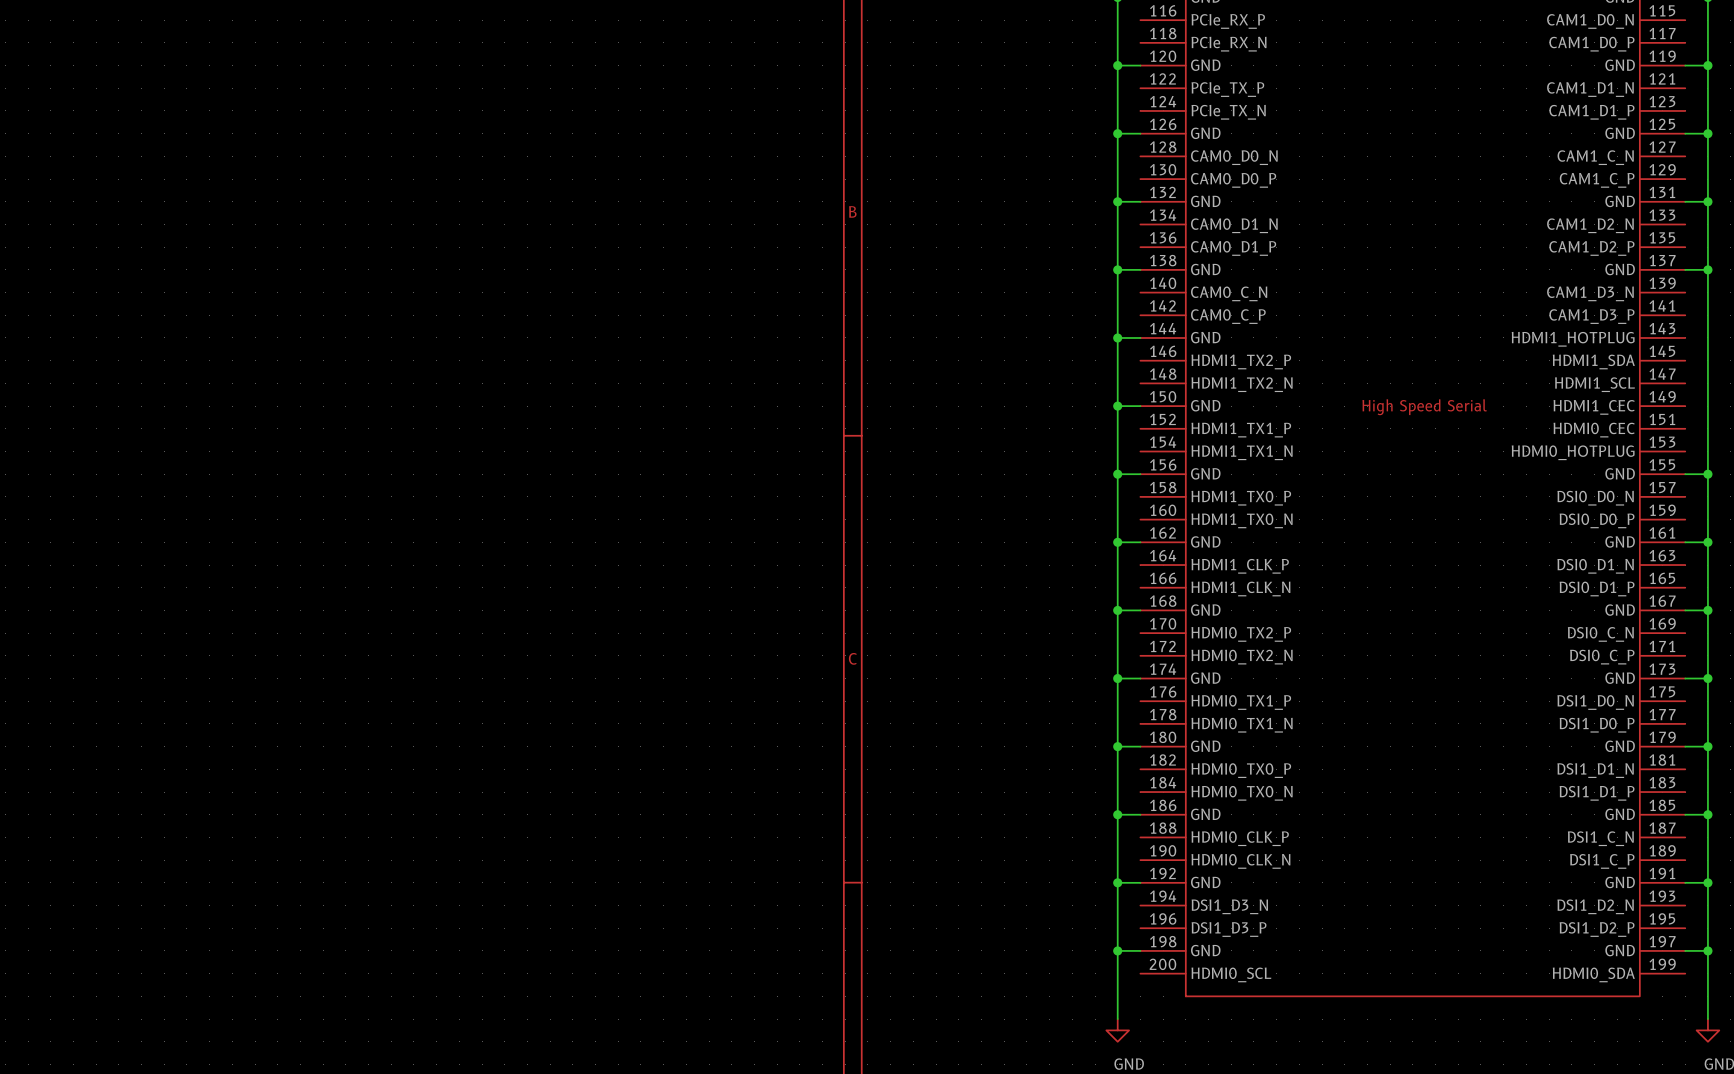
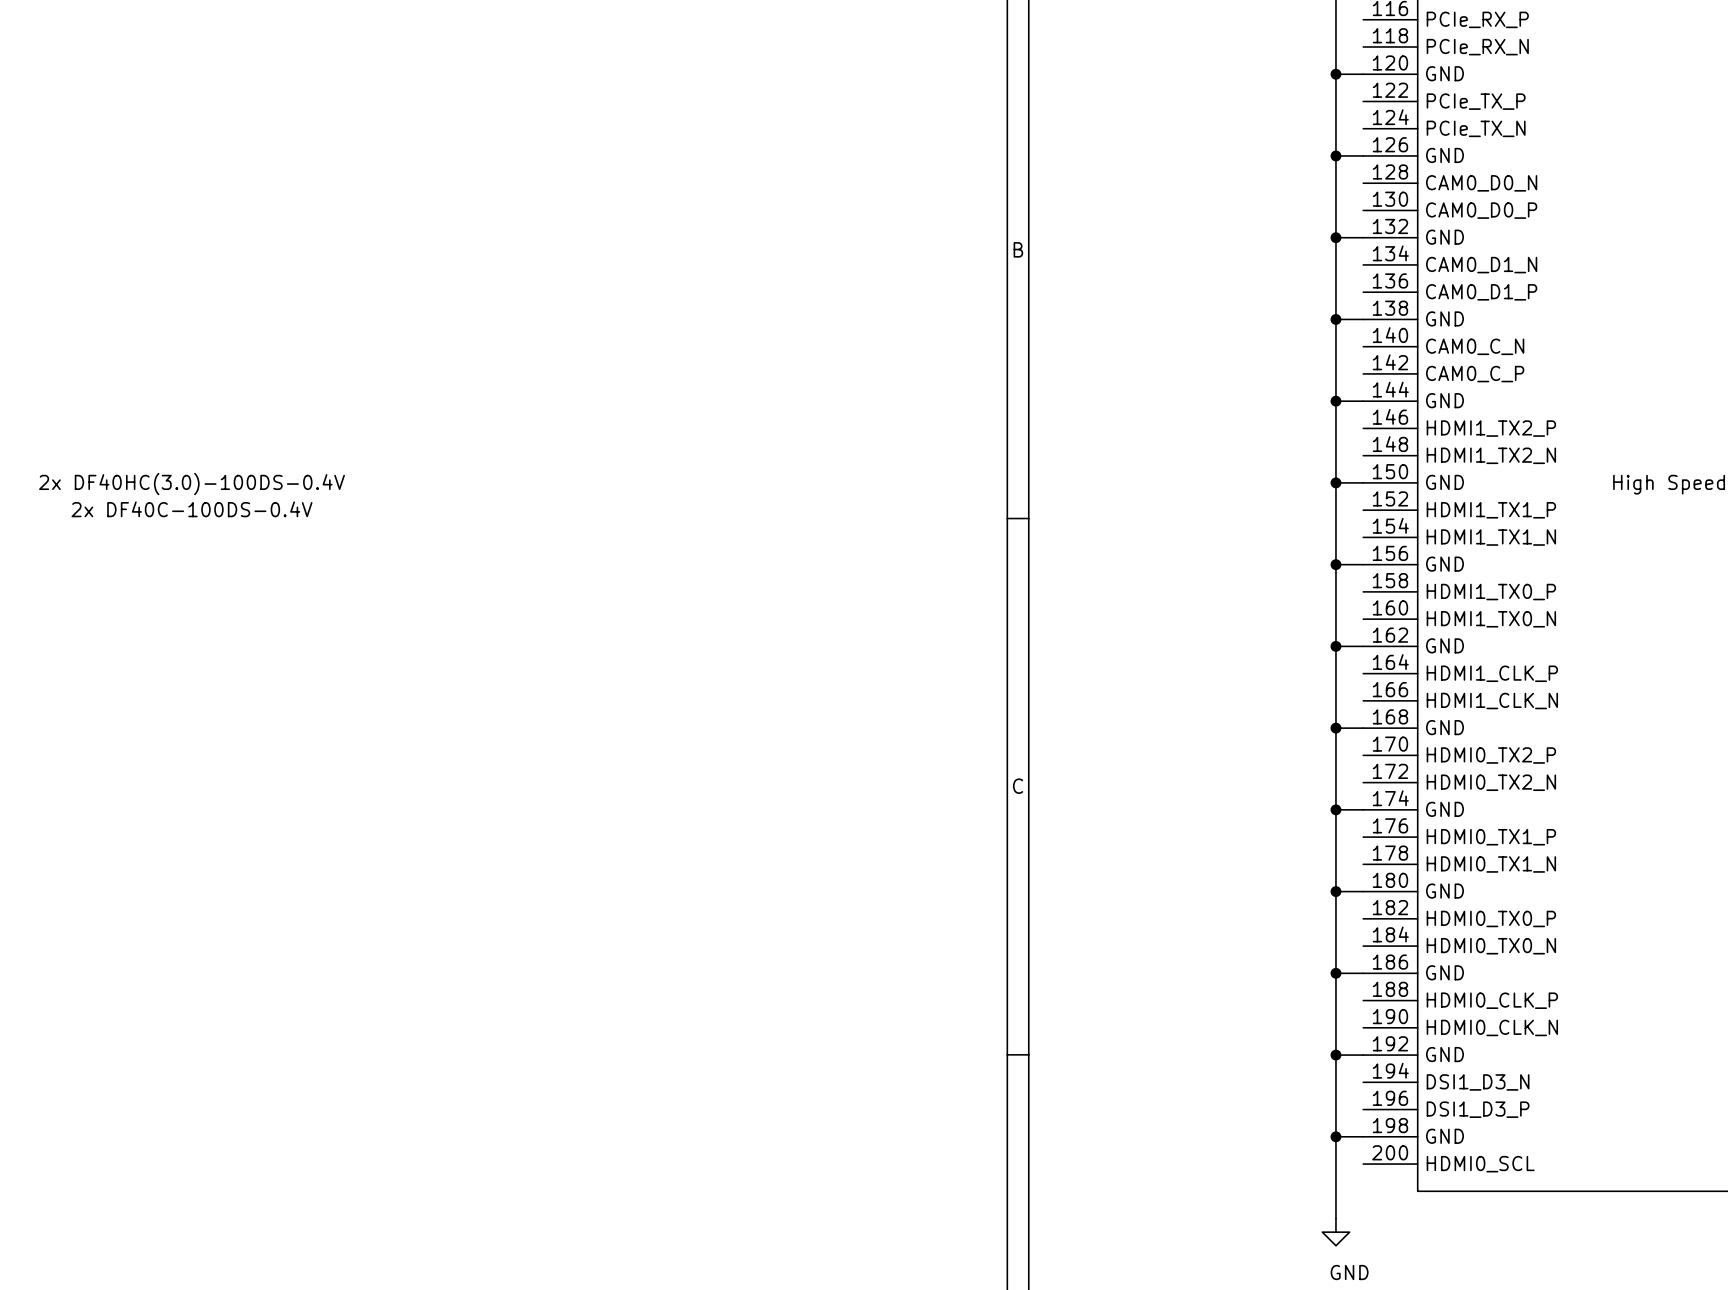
part text: none -> 2x DF40HC(3.0)-100DS-0.4V (192, 484)
part text: none -> 2x DF40C-100DS-0.4V (192, 509)

